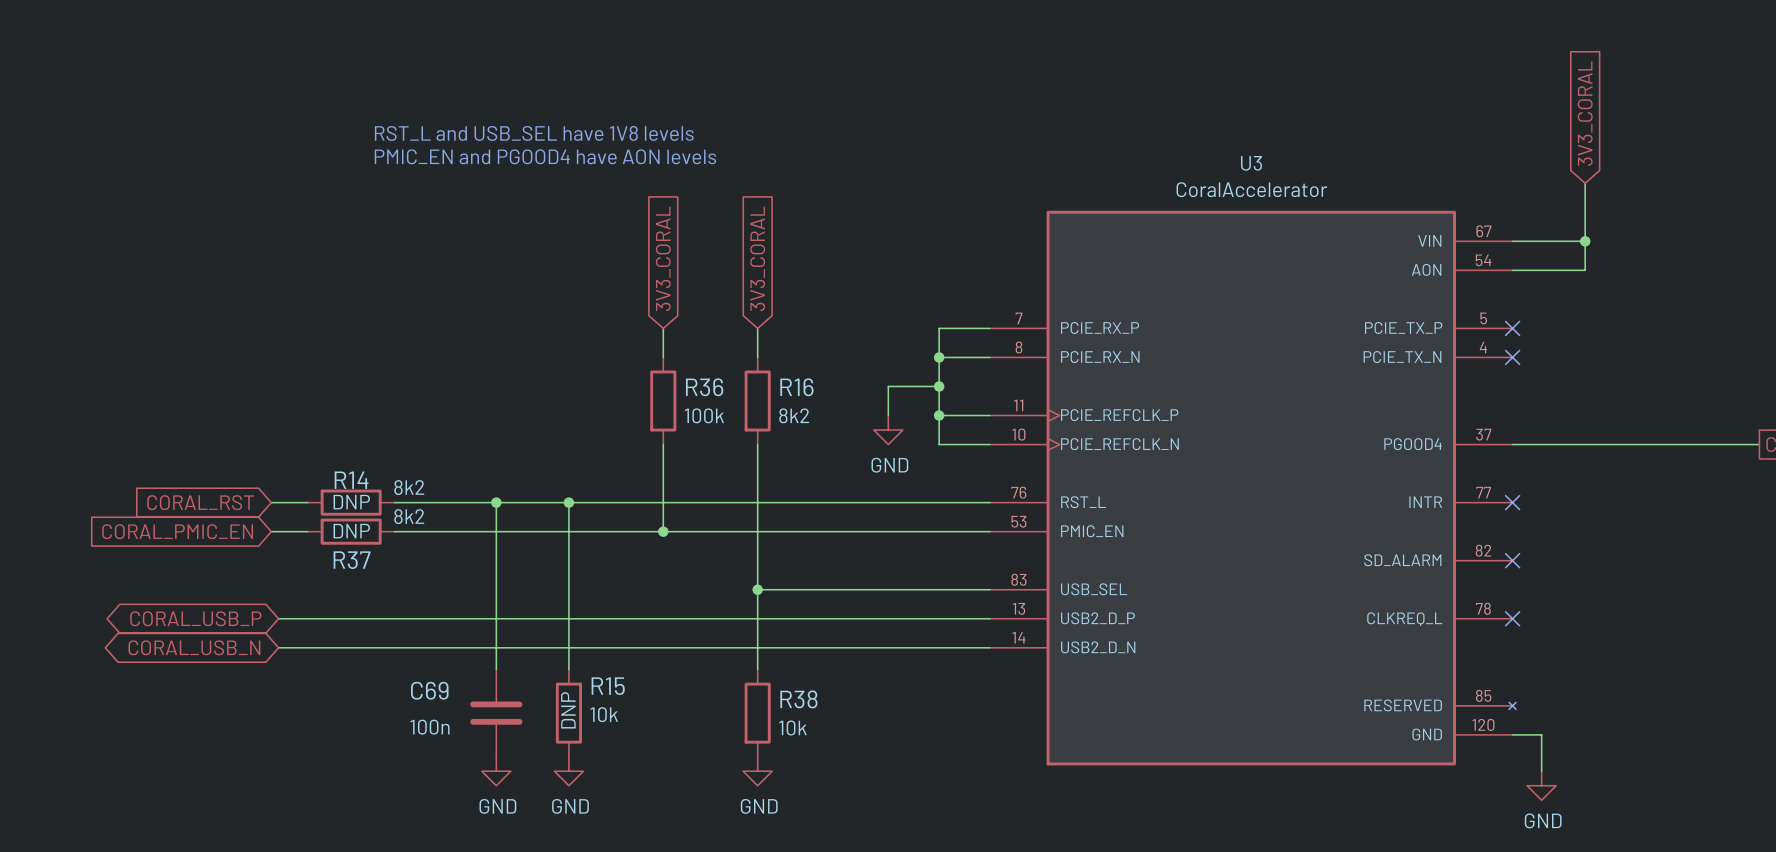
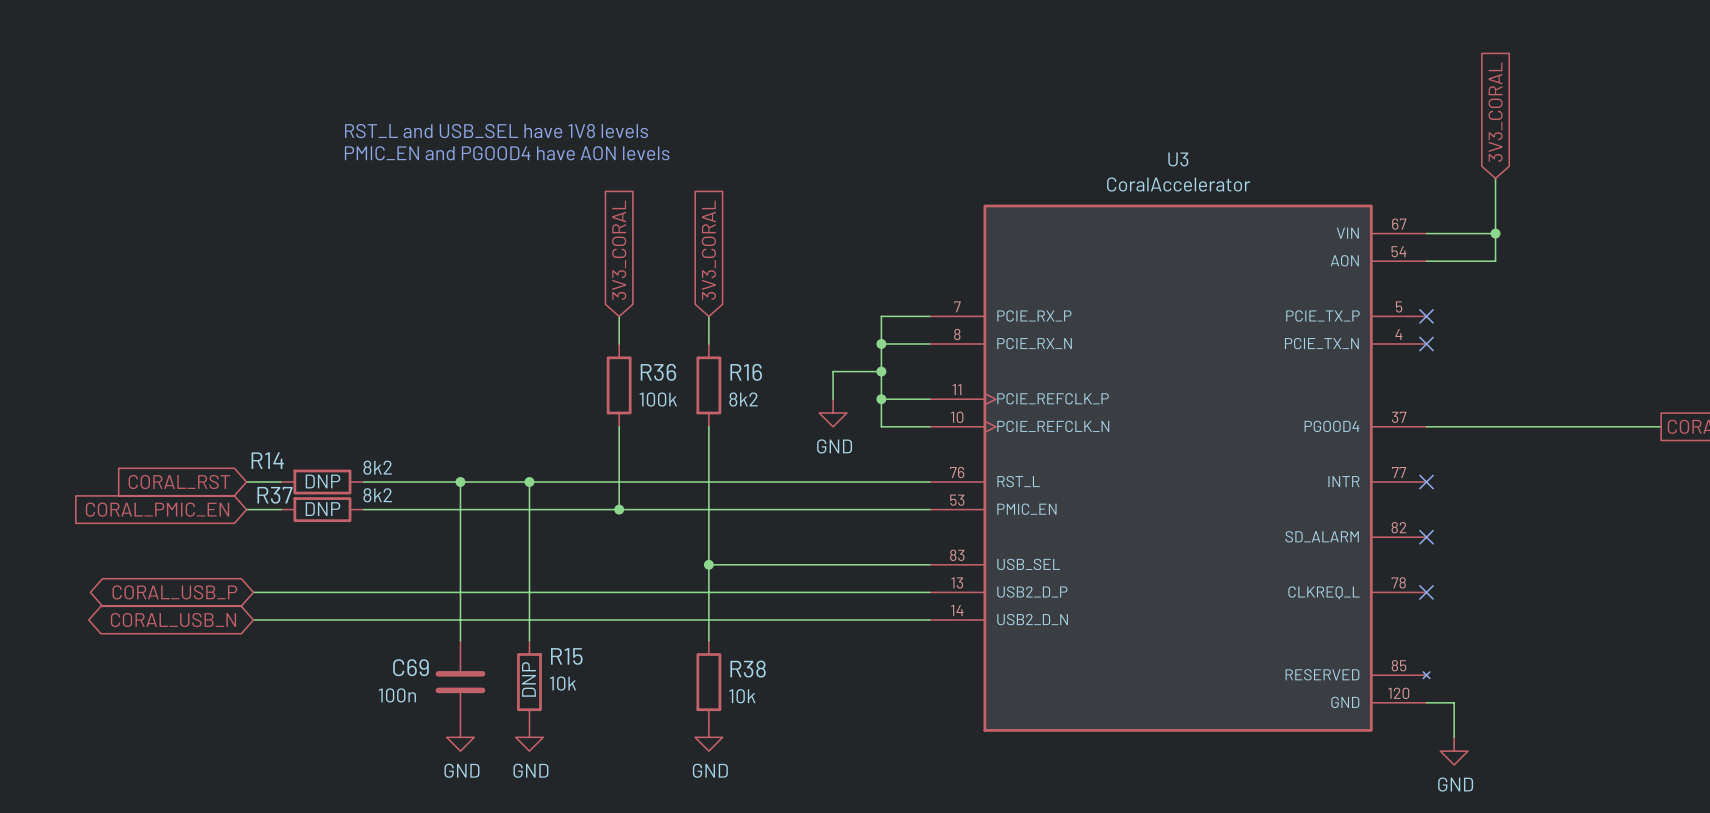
R14 name position: R14 (351, 480) -> R14 (267, 460)
R37 name position: R37 (352, 560) -> R37 (275, 495)
C69 name position: C69 (429, 690) -> C69 (410, 667)

